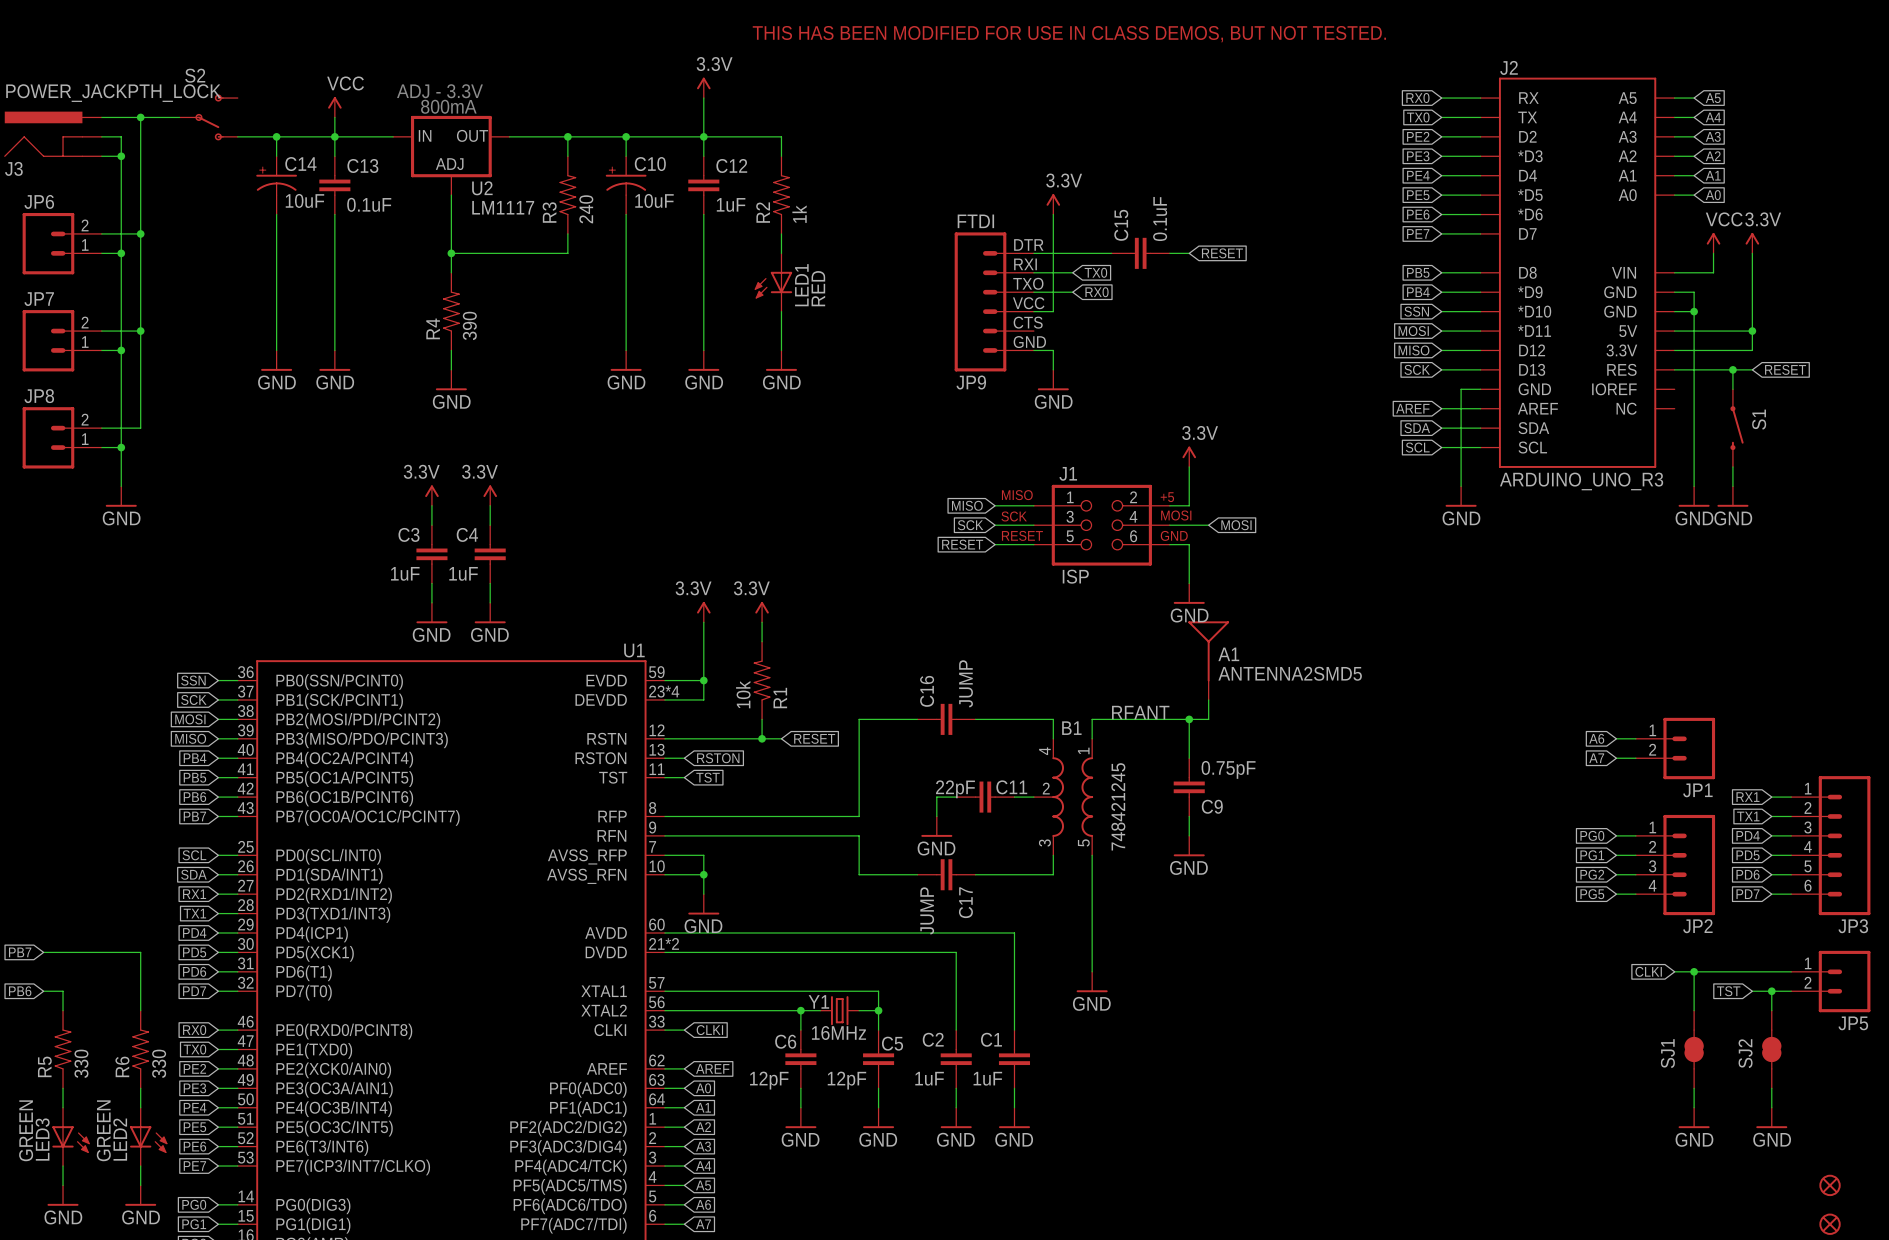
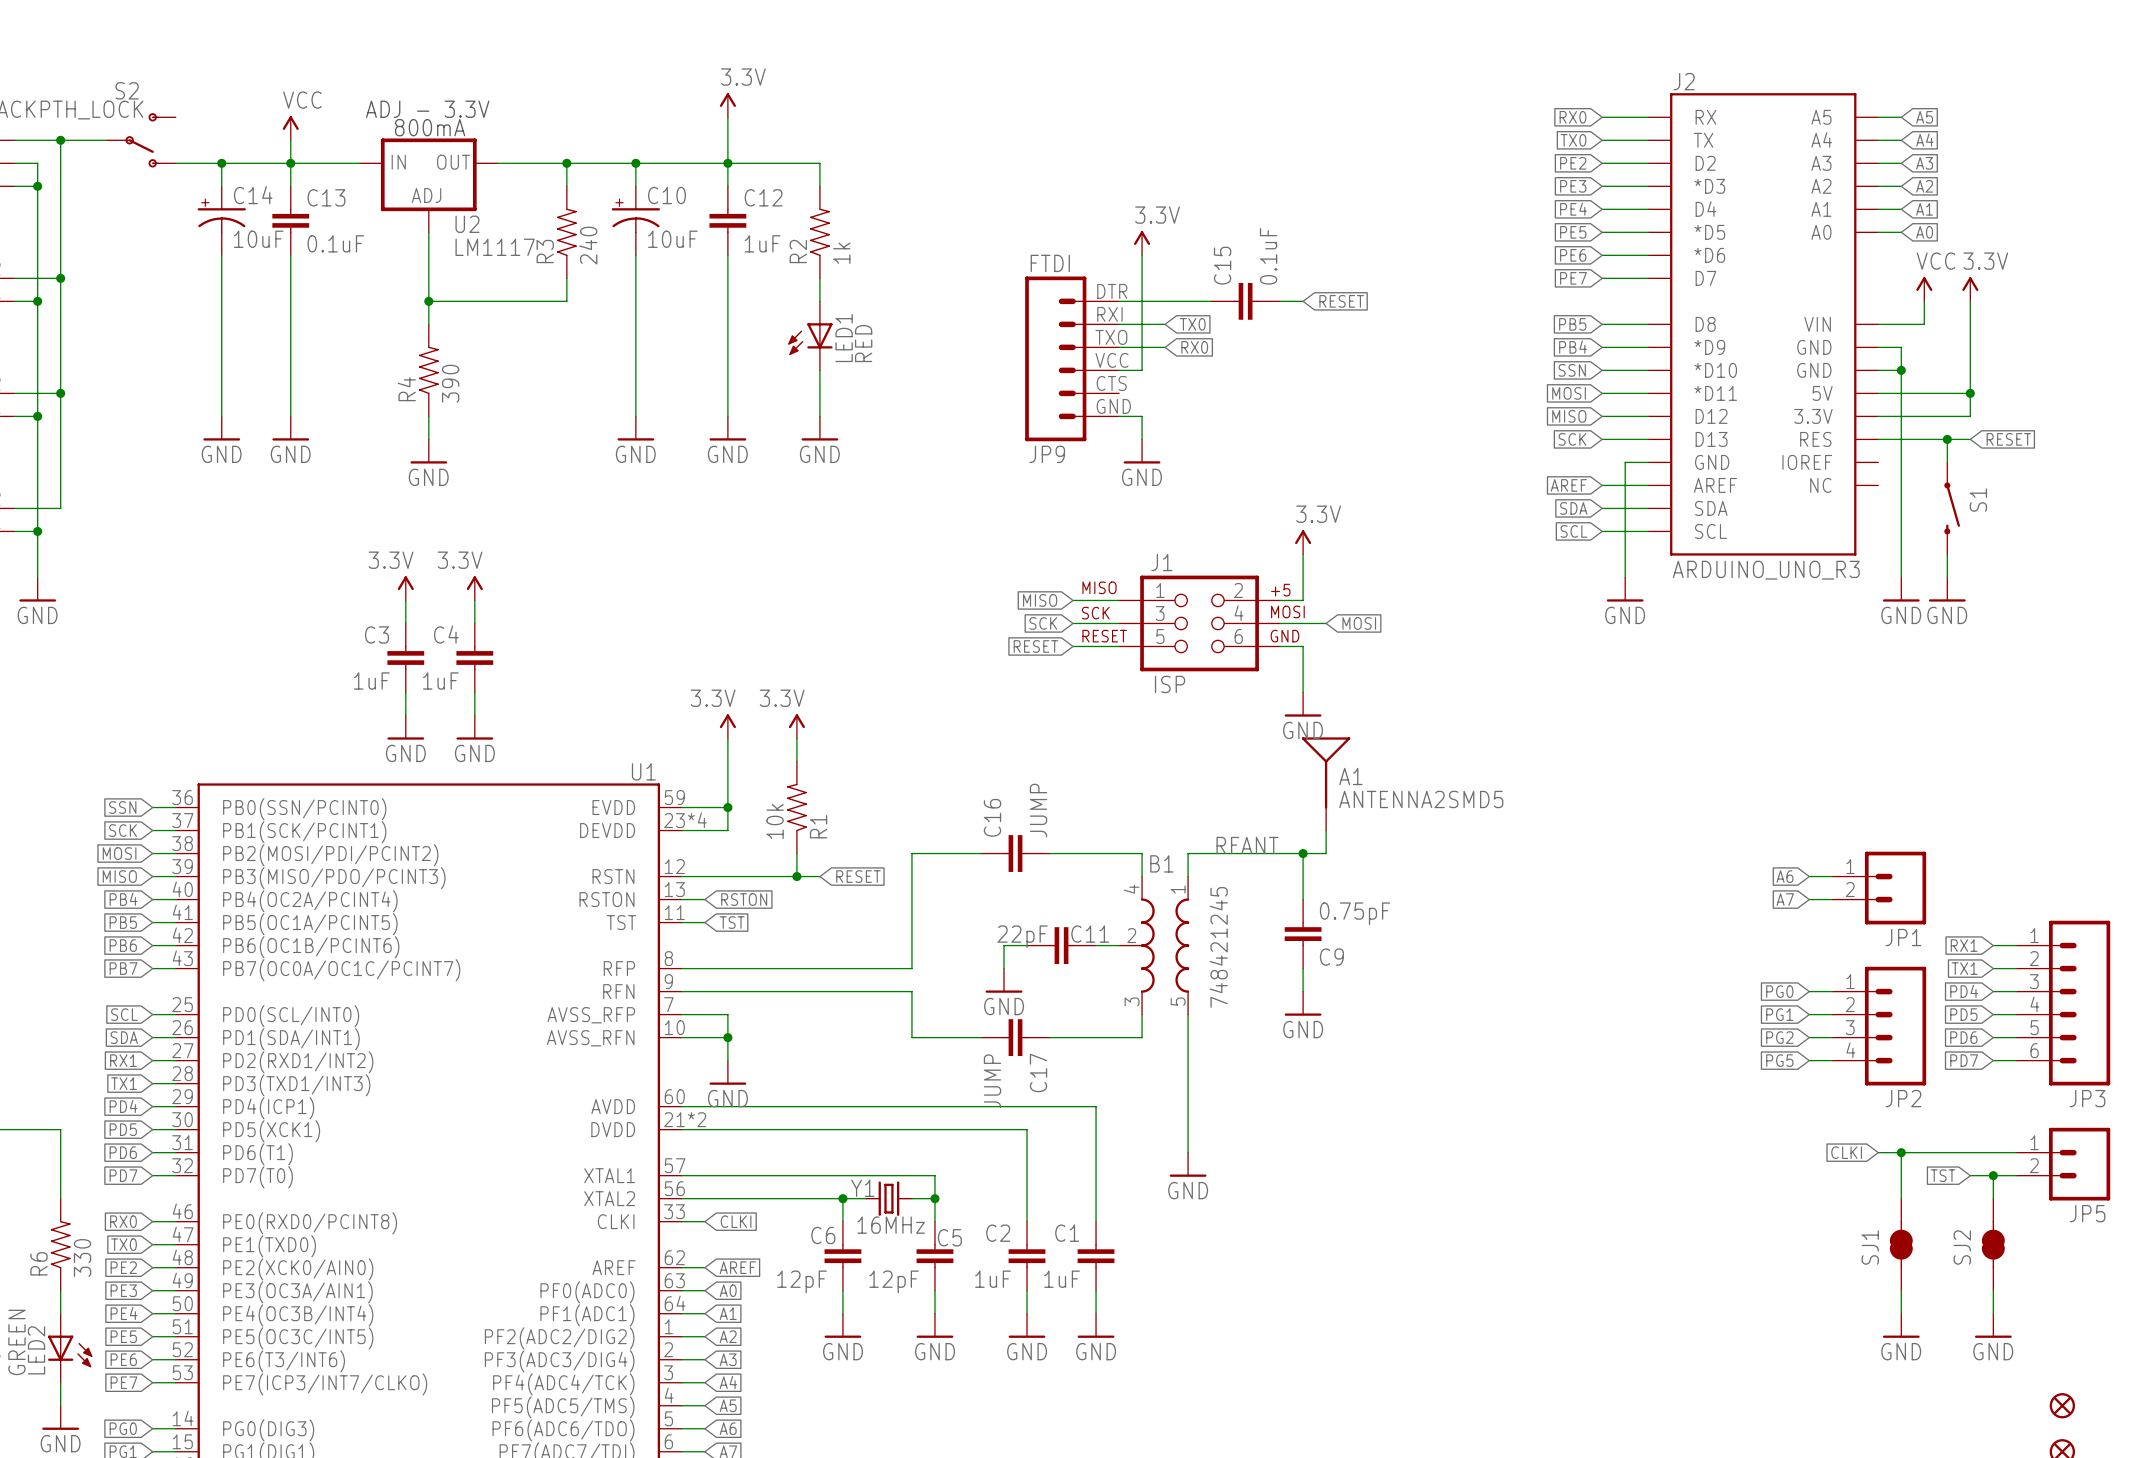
text: THIS HAS BEEN MODIFIED FOR USE IN CLASS DEMOS, BUT NOT TESTED. (1069, 34) -> none

